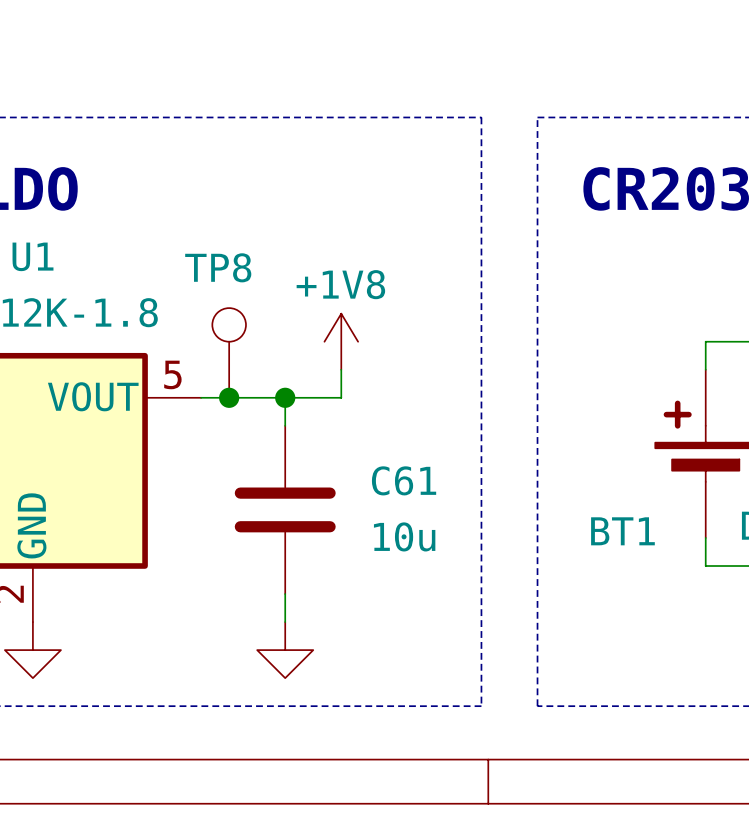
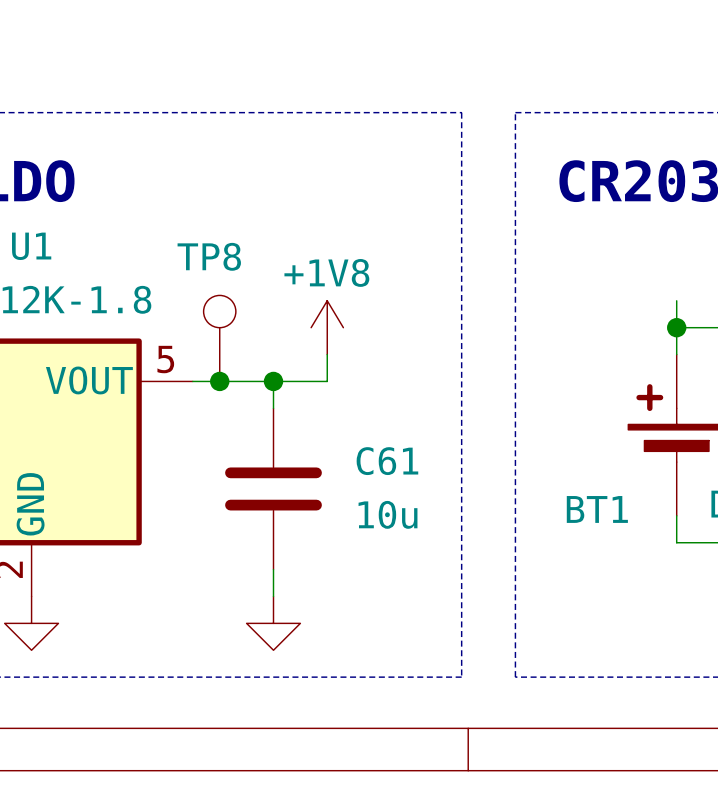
wire: none -> (676, 300) (676, 327)
junction: none -> (676, 327)

